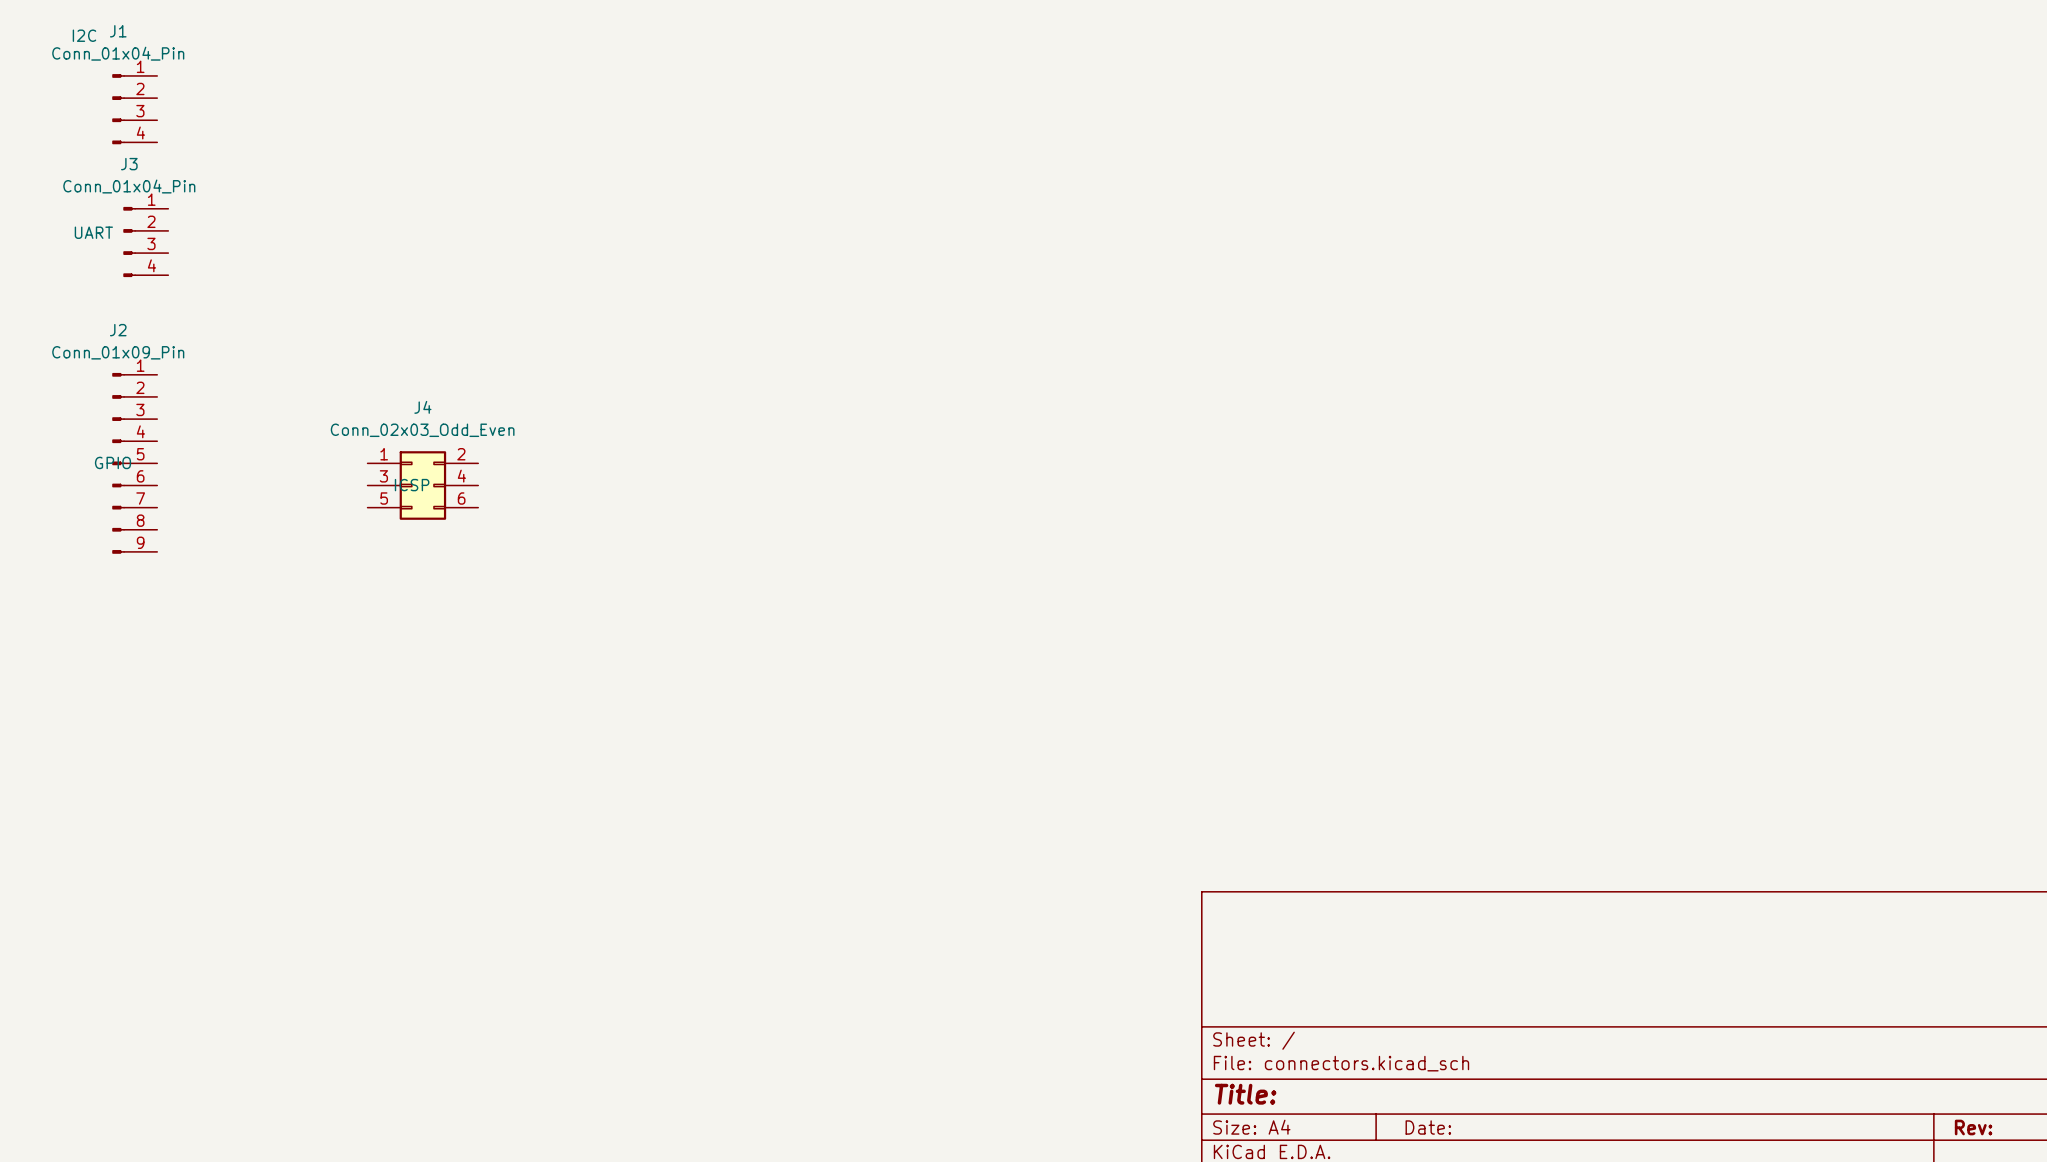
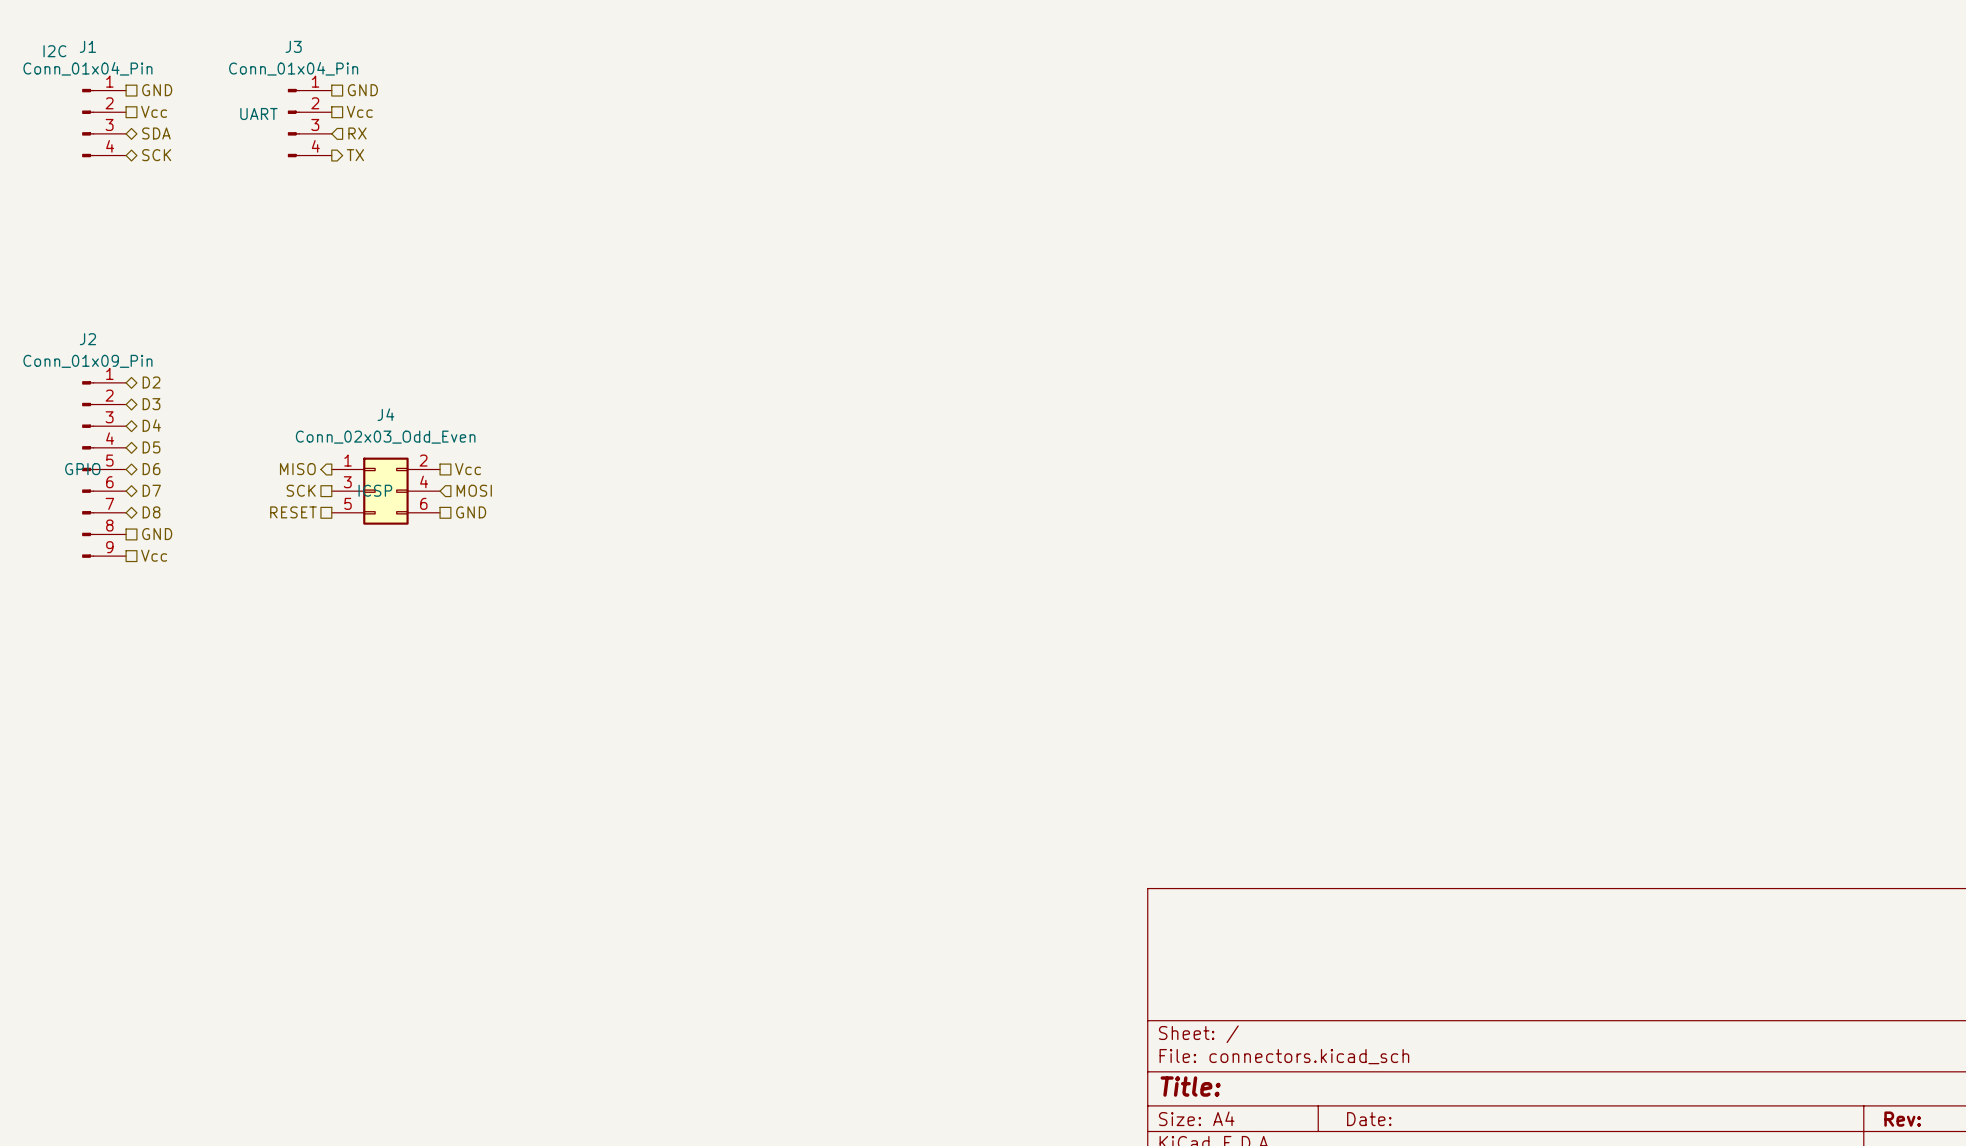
hierarchical label: none -> GND (157, 90)
hierarchical label: none -> GND (362, 90)
hierarchical label: none -> Vcc (154, 111)
hierarchical label: none -> Vcc (359, 111)
hierarchical label: none -> SDA (156, 133)
hierarchical label: none -> RX (357, 133)
hierarchical label: none -> SCK (156, 155)
hierarchical label: none -> TX (355, 155)
J3 position: (145, 242) -> (309, 123)
hierarchical label: none -> D2 (151, 382)
hierarchical label: none -> D3 (151, 404)
hierarchical label: none -> D4 (151, 425)
hierarchical label: none -> D5 (151, 447)
hierarchical label: none -> D6 (151, 469)
hierarchical label: none -> MISO (297, 469)
hierarchical label: none -> Vcc (468, 469)
hierarchical label: none -> D7 (151, 490)
hierarchical label: none -> SCK (301, 490)
hierarchical label: none -> MOSI (474, 490)
hierarchical label: none -> D8 (151, 512)
hierarchical label: none -> RESET (293, 512)
hierarchical label: none -> GND (471, 512)
hierarchical label: none -> GND (157, 534)
hierarchical label: none -> Vcc (154, 555)

